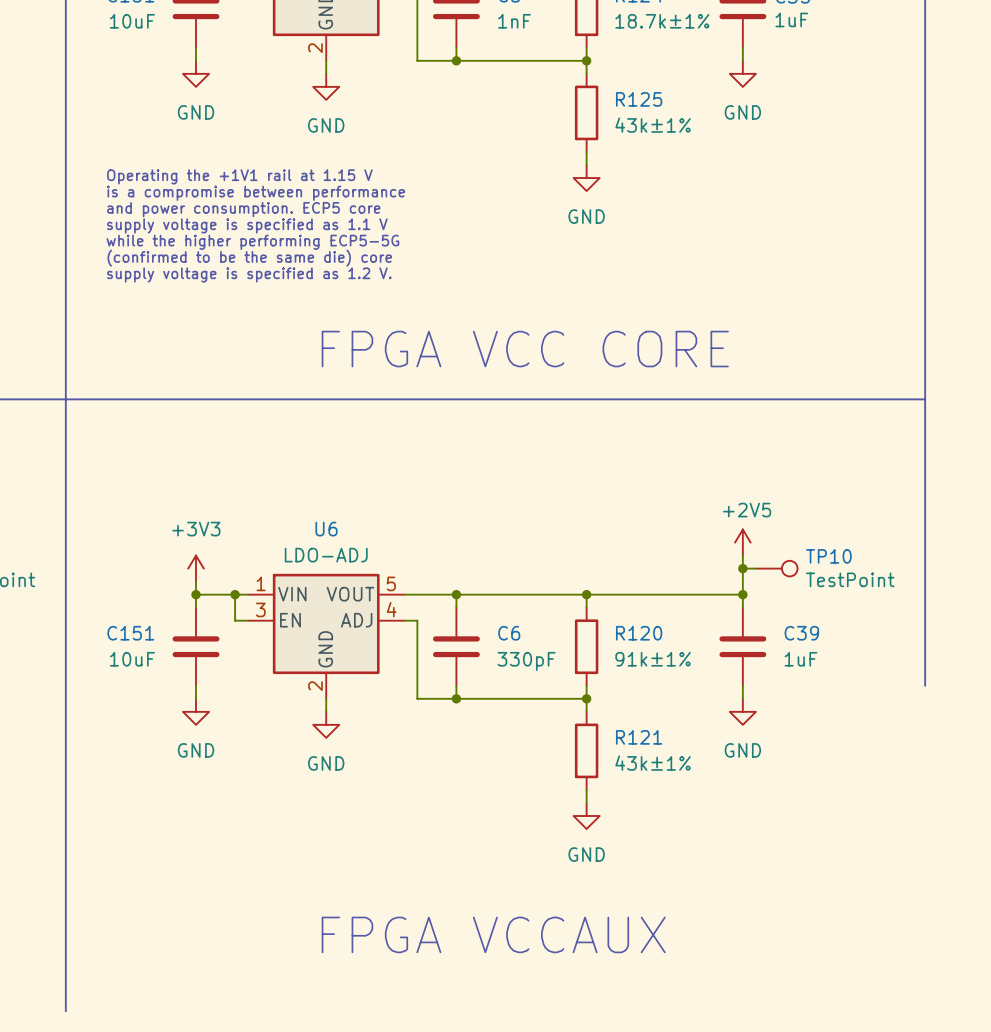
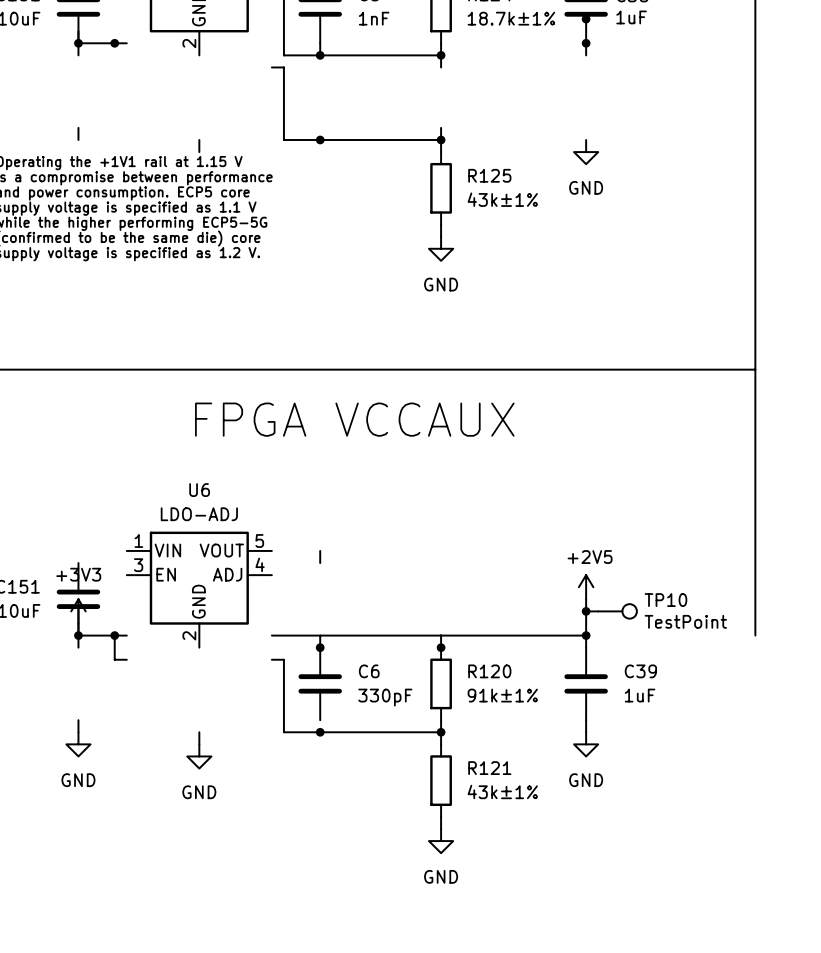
junction: none -> (586, 19)
wire: none -> (78, 31) (78, 43) (126, 43)
junction: none -> (78, 43)
junction: none -> (114, 43)
junction: none -> (586, 43)
wire: (326, 60) (326, 73) -> (199, 139) (199, 152)
power symbol: GND (196, 73) -> none
wire: none -> (271, 67) (283, 67) (283, 139) (441, 139) (441, 127)
power symbol: GND (742, 73) -> none
power symbol: GND (326, 86) -> none
R125 position: (586, 112) -> (441, 188)
wire: none -> (78, 127) (78, 139)
junction: none -> (320, 139)
junction: none -> (441, 139)
power symbol: none -> GND (586, 152)
power symbol: GND (586, 178) -> none
wire: none -> (441, 224) (441, 236)
power symbol: none -> GND (441, 248)
text: FPGA VCC CORE (525, 349) -> none
text: none -> FPGA VCCAUX (354, 419)
power symbol position: +2V5 (742, 542) -> +2V5 (586, 587)
wire: (742, 555) (742, 607) -> none
power symbol position: +3V3 (196, 568) -> +3V3 (78, 611)
wire: (742, 568) (755, 568) -> (586, 611) (598, 611)
junction: (742, 568) -> none
TP10 position: (776, 568) -> (617, 611)
wire: (196, 581) (196, 607) -> none
wire: (196, 594) (248, 594) -> none
junction: (196, 594) -> none
wire: (235, 594) (235, 620) (248, 620) -> (114, 635) (114, 659) (126, 659)
junction: (235, 594) -> none
wire: (404, 594) (742, 594) -> none
junction: (456, 594) -> none
wire: (586, 594) (586, 607) -> (586, 720) (586, 732)
junction: (586, 594) -> none
junction: (742, 594) -> none
wire: (404, 620) (417, 620) (417, 698) (586, 698) (586, 711) -> none
C6 position: (456, 646) -> (320, 683)
R120 position: (586, 646) -> (441, 683)
wire: none -> (586, 599) (586, 635) (271, 635)
C39 position: (742, 646) -> (586, 683)
junction: none -> (586, 611)
wire: none -> (78, 623) (78, 635) (126, 635)
junction: none -> (78, 635)
junction: none -> (114, 635)
junction: none -> (586, 635)
wire: (326, 698) (326, 711) -> (199, 732) (199, 744)
power symbol: GND (196, 711) -> none
wire: none -> (271, 659) (283, 659) (283, 732) (441, 732) (441, 720)
power symbol: GND (742, 711) -> none
power symbol: GND (326, 724) -> none
R121 position: (586, 750) -> (441, 780)
wire: none -> (78, 720) (78, 732)
junction: none -> (320, 732)
junction: none -> (441, 732)
power symbol: none -> GND (78, 744)
power symbol: none -> GND (586, 744)
power symbol: none -> GND (199, 756)
power symbol: GND (586, 815) -> none
wire: none -> (441, 816) (441, 828)
power symbol: none -> GND (441, 841)
text: FPGA VCCAUX (493, 934) -> none

